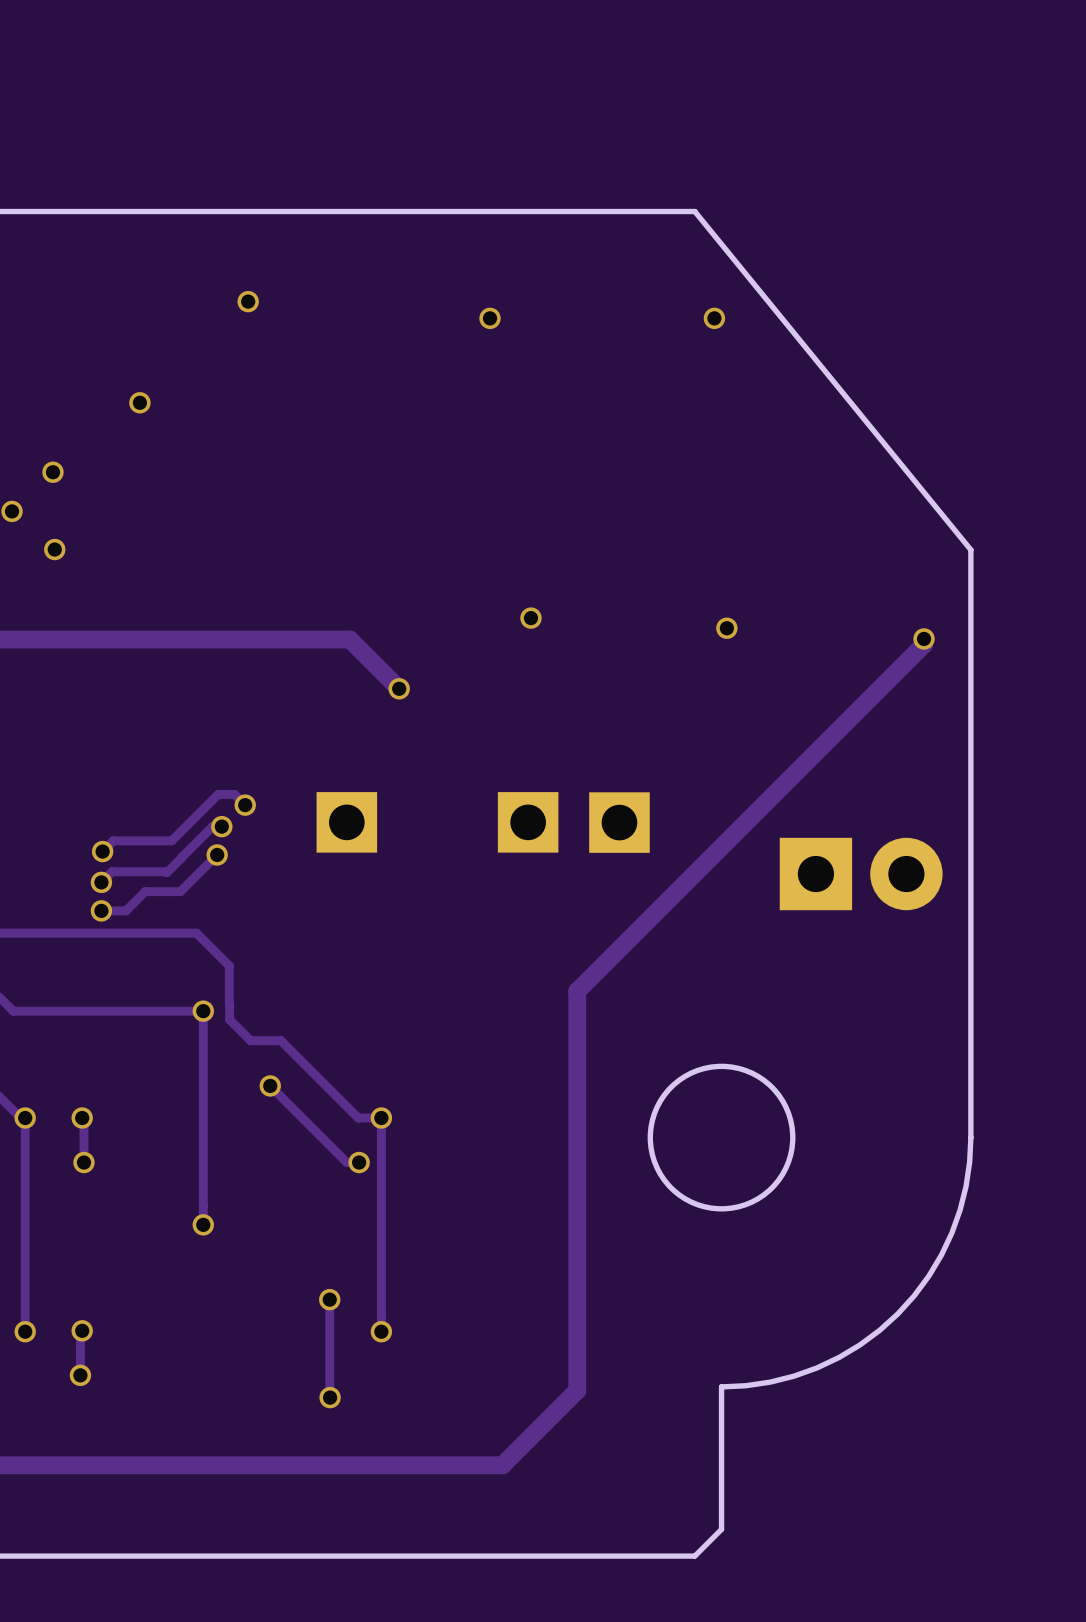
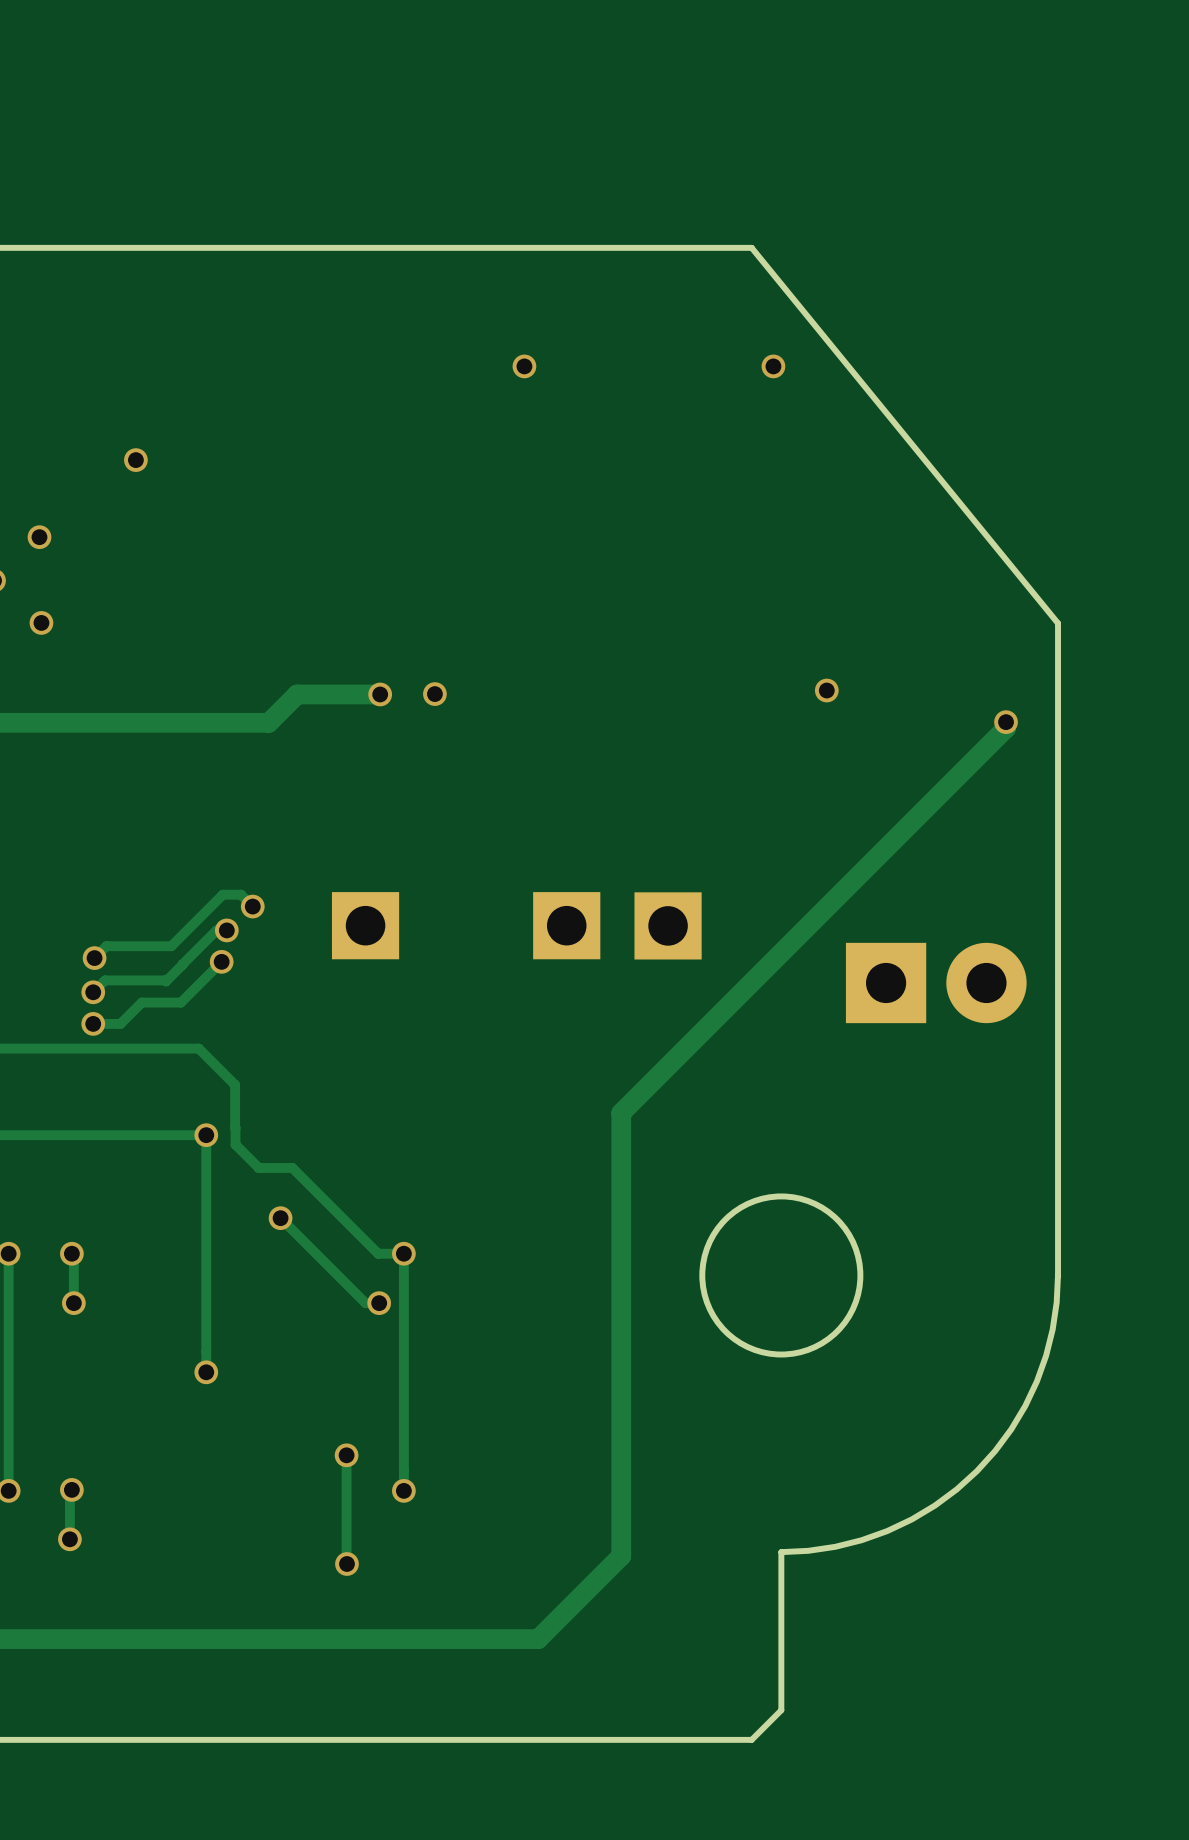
via: (248, 301) -> none
via: none -> (434, 694)
via: none -> (380, 694)
via: (530, 618) -> none
via position: (726, 628) -> (826, 690)
track: (259, 639) (349, 639) (399, 688) -> (268, 722) (297, 694) (380, 694)
via: (399, 688) -> none

